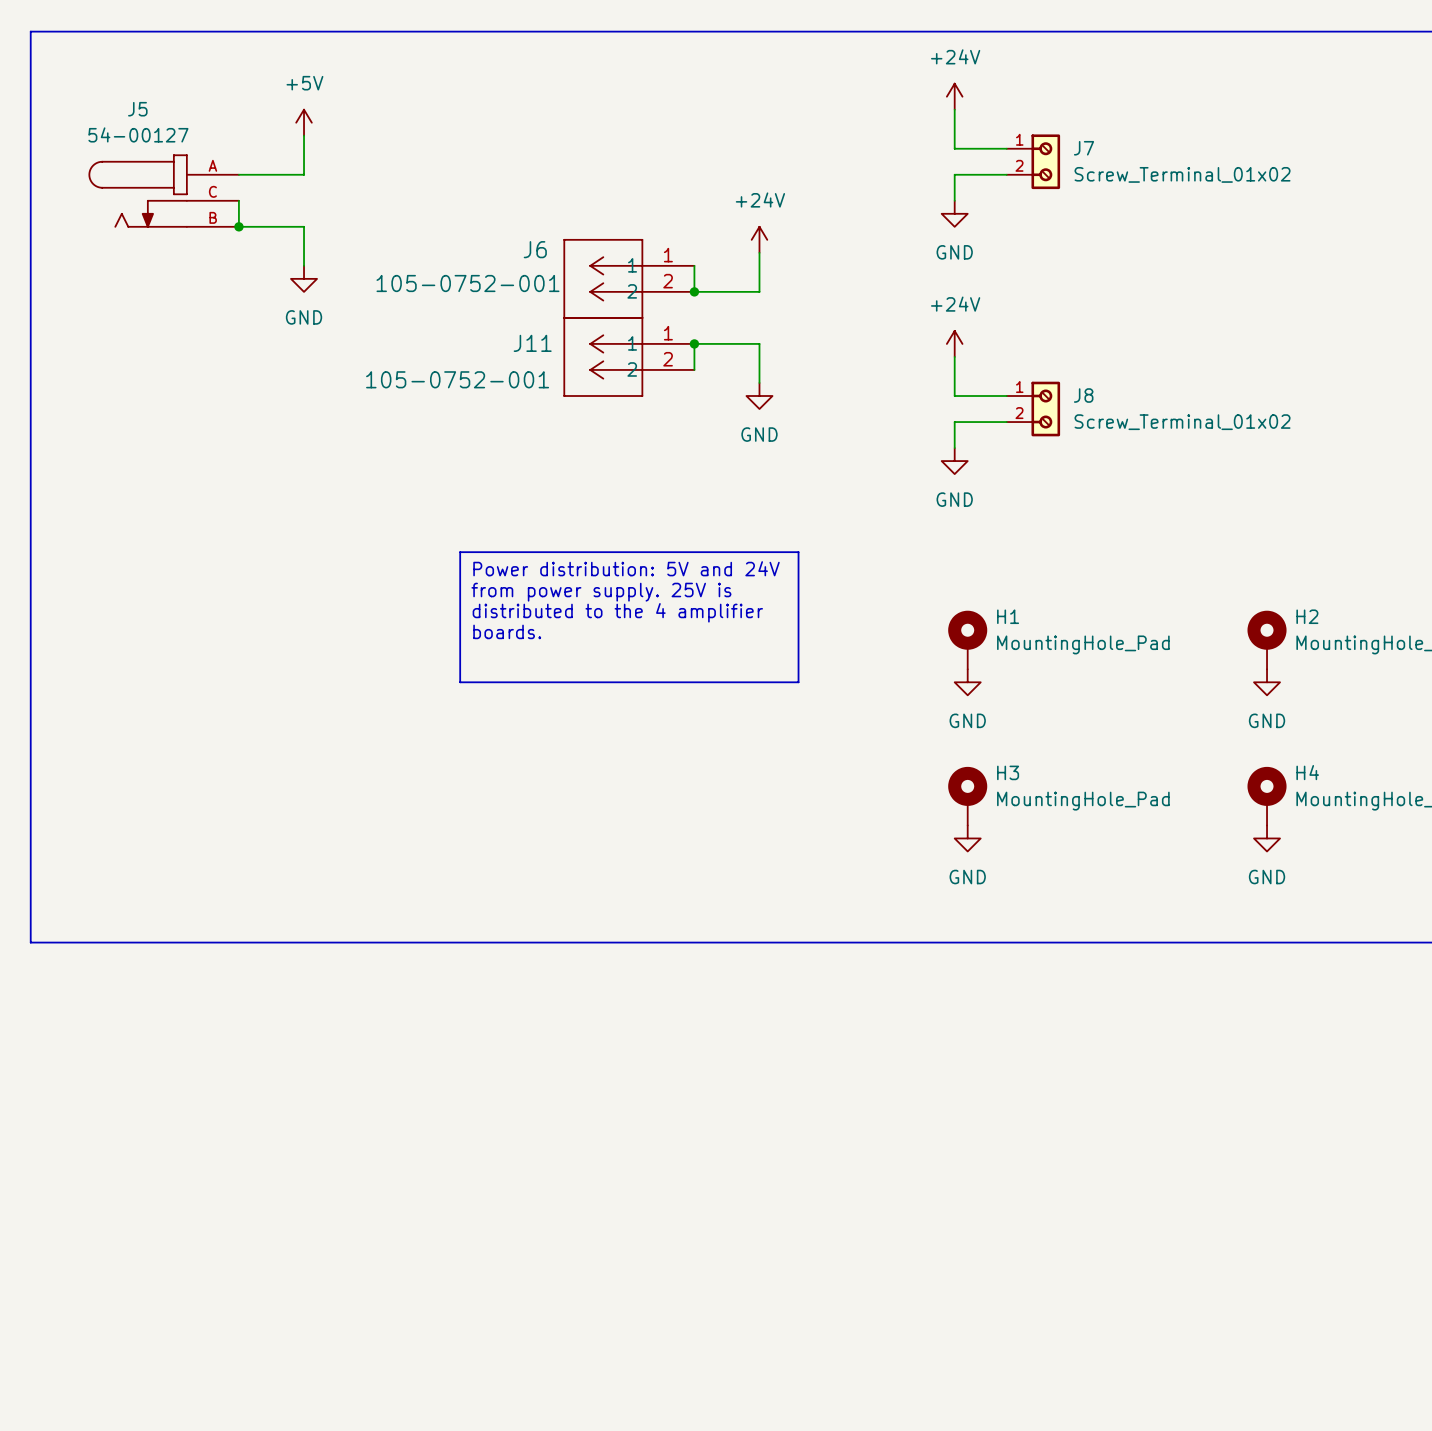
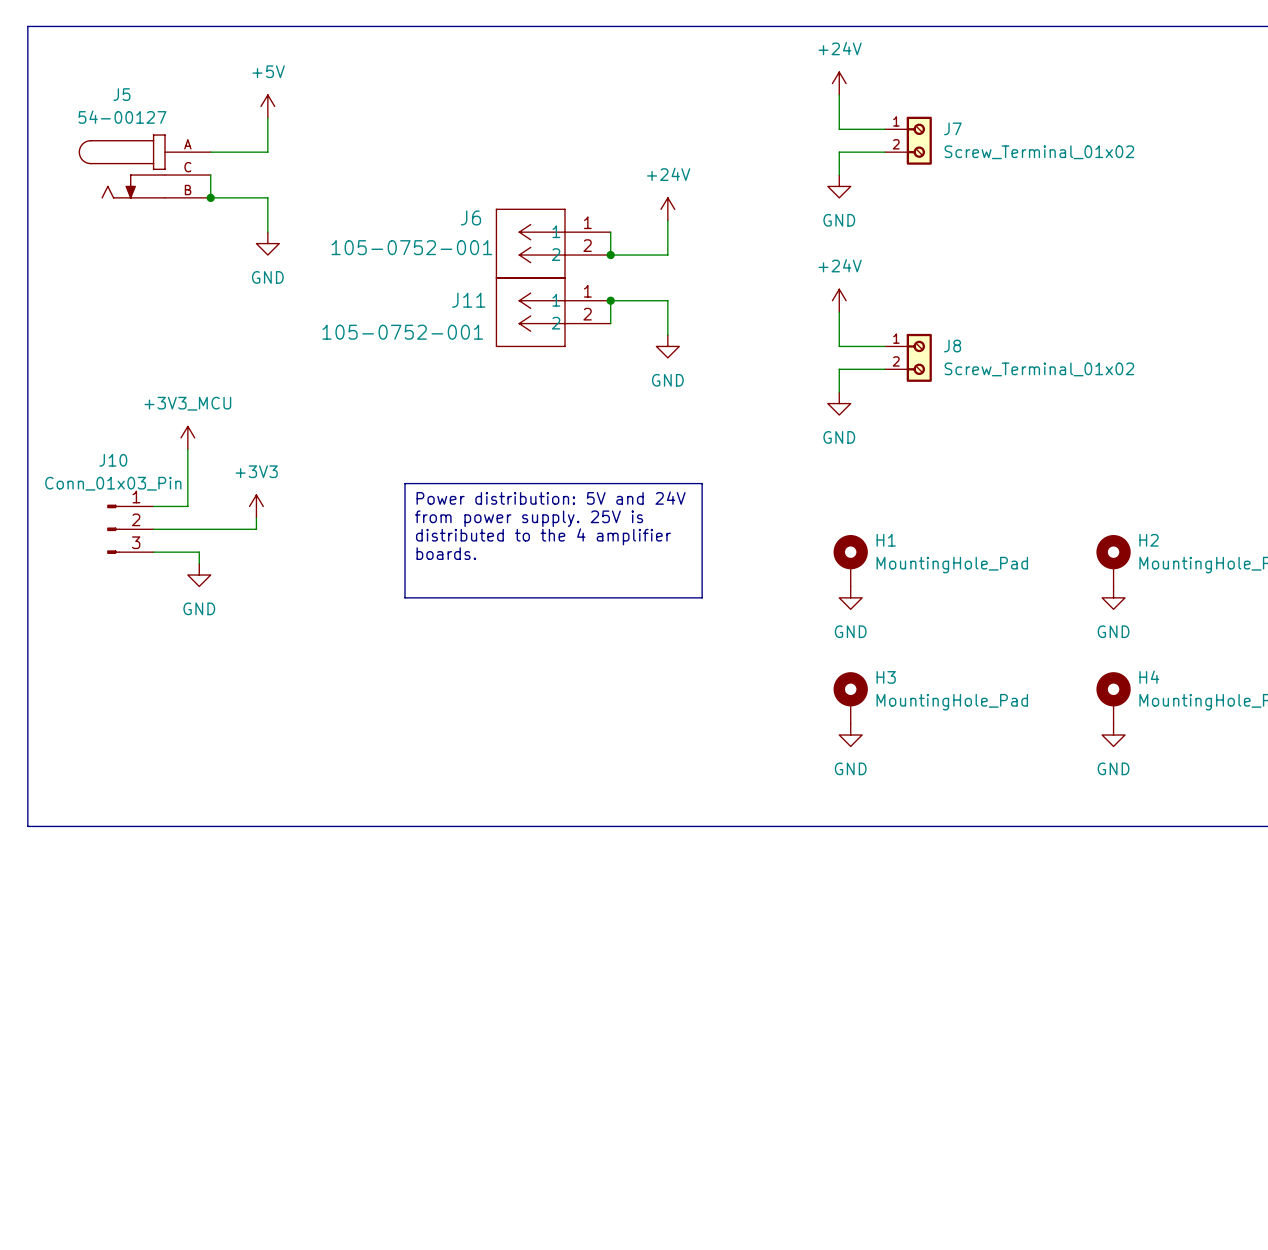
power symbol: none -> +3V3_MCU (187, 437)
wire: none -> (187, 449) (187, 506) (153, 506)
power symbol: none -> +3V3 (256, 506)
wire: none -> (256, 517) (256, 529) (153, 529)
J10: none -> Conn_01x03_Pin (130, 529)
wire: none -> (153, 552) (199, 552) (199, 563)
power symbol: none -> GND (199, 575)

